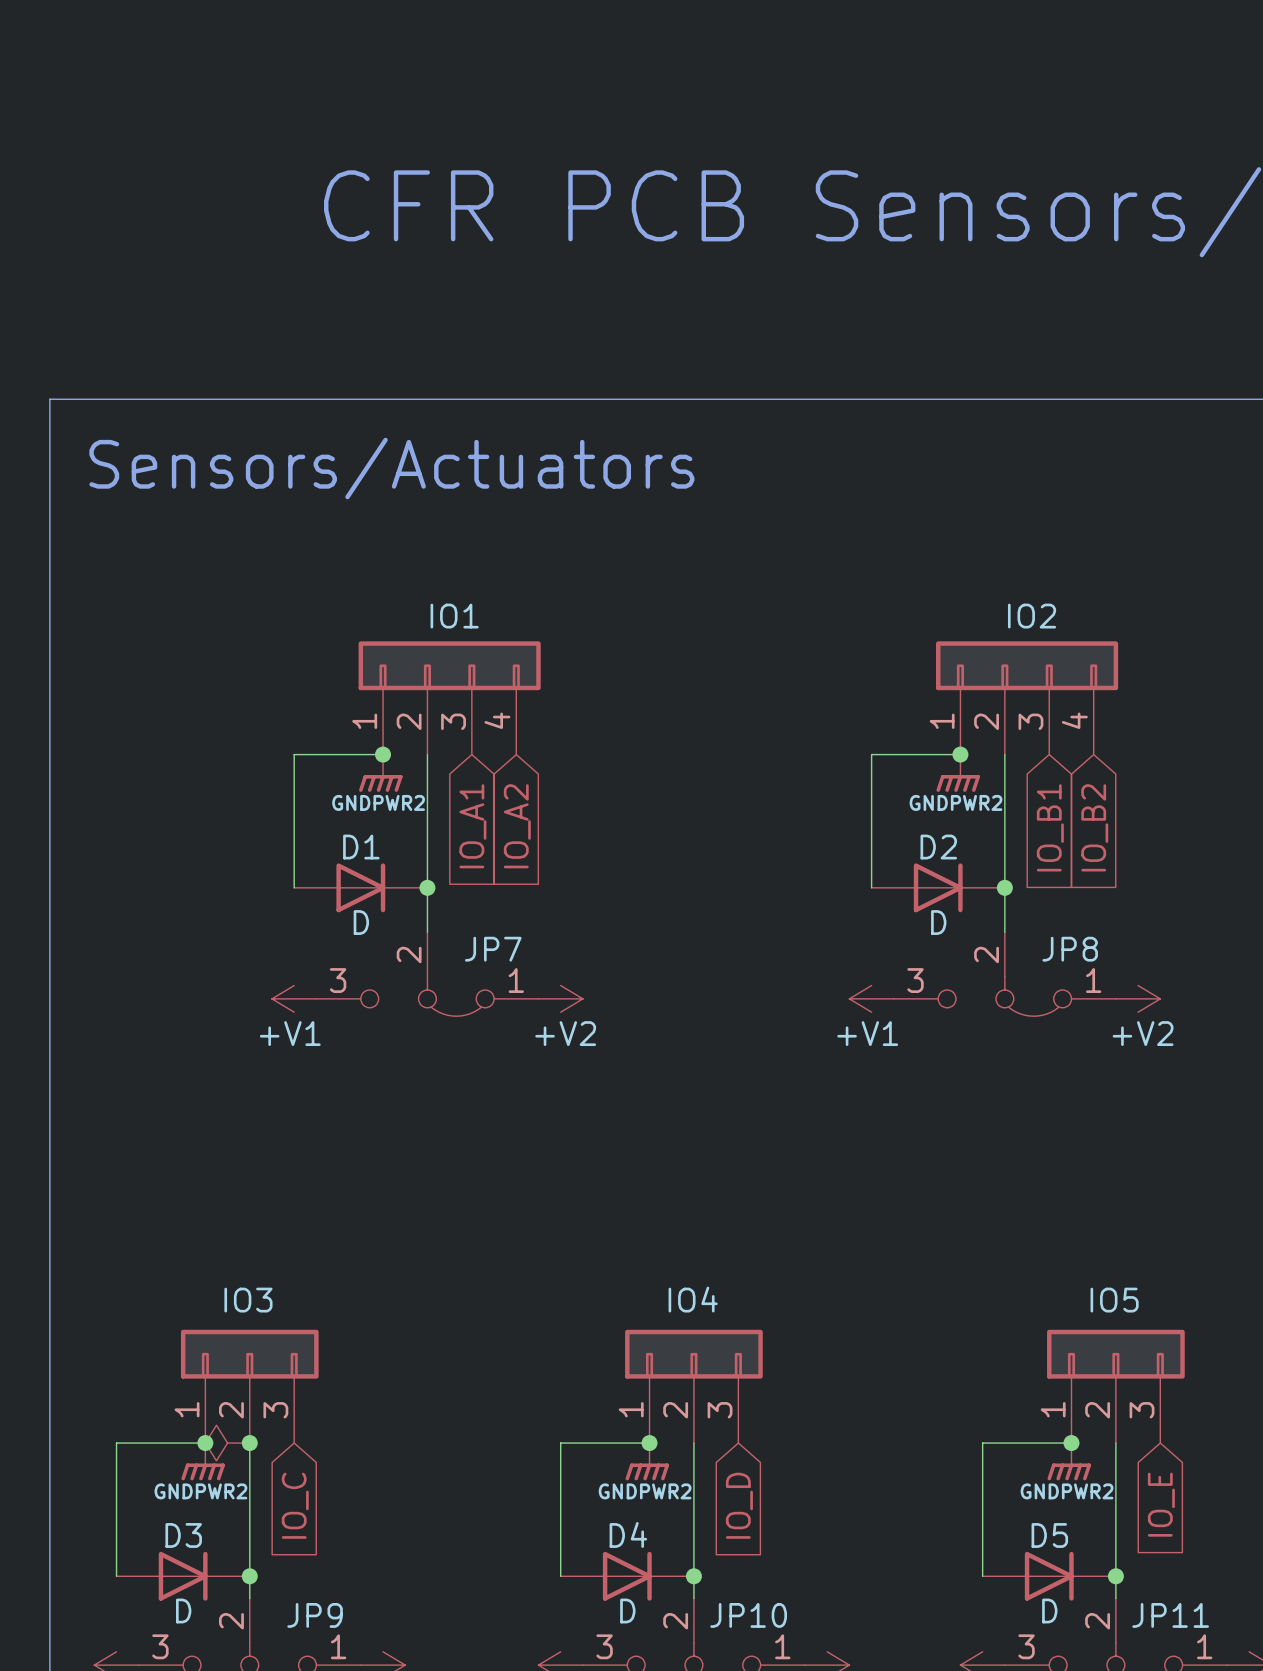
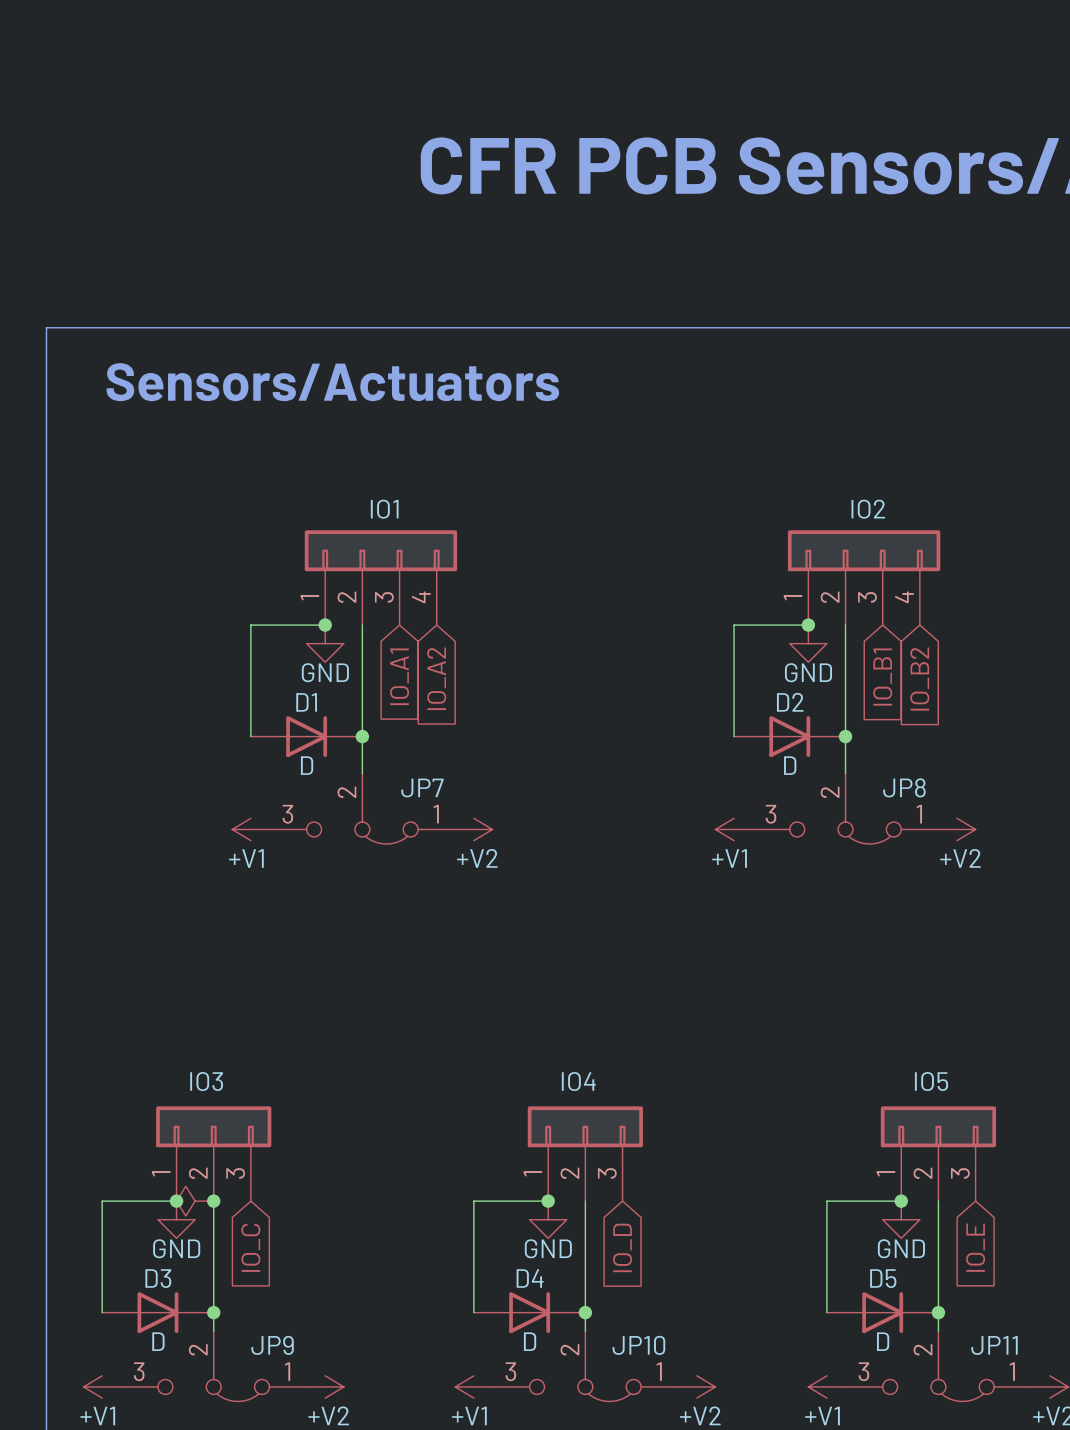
power symbol: GNDPWR2 (380, 773) -> GND (325, 643)
power symbol: GNDPWR2 (958, 773) -> GND (808, 643)
power symbol: GNDPWR2 (203, 1461) -> GND (176, 1219)
power symbol: GNDPWR2 (647, 1461) -> GND (548, 1219)
power symbol: GNDPWR2 (1069, 1461) -> GND (901, 1219)

